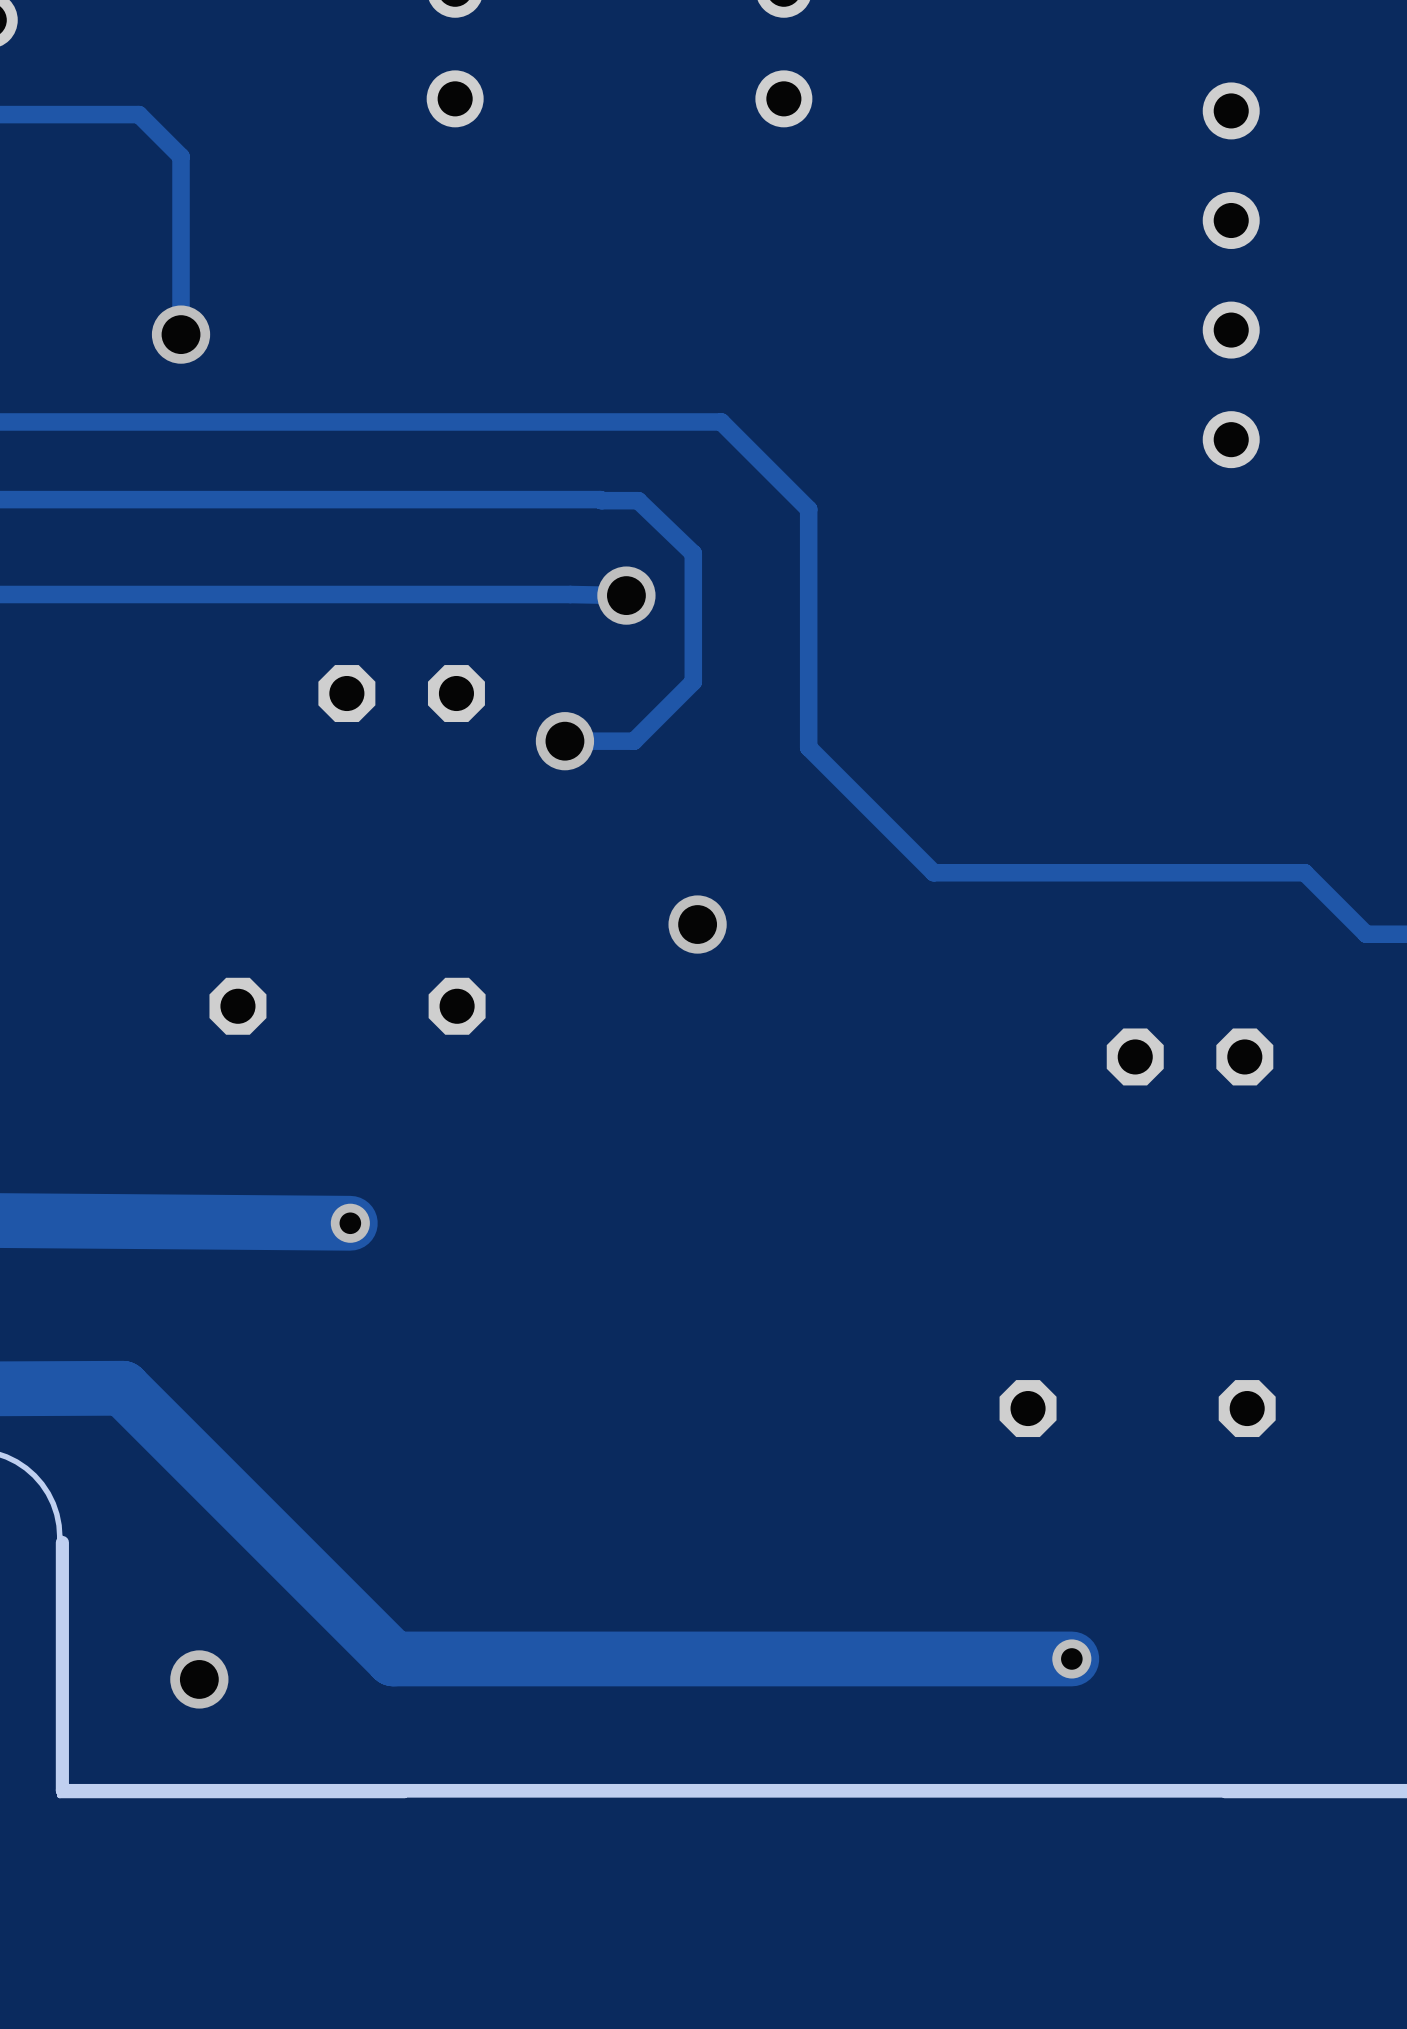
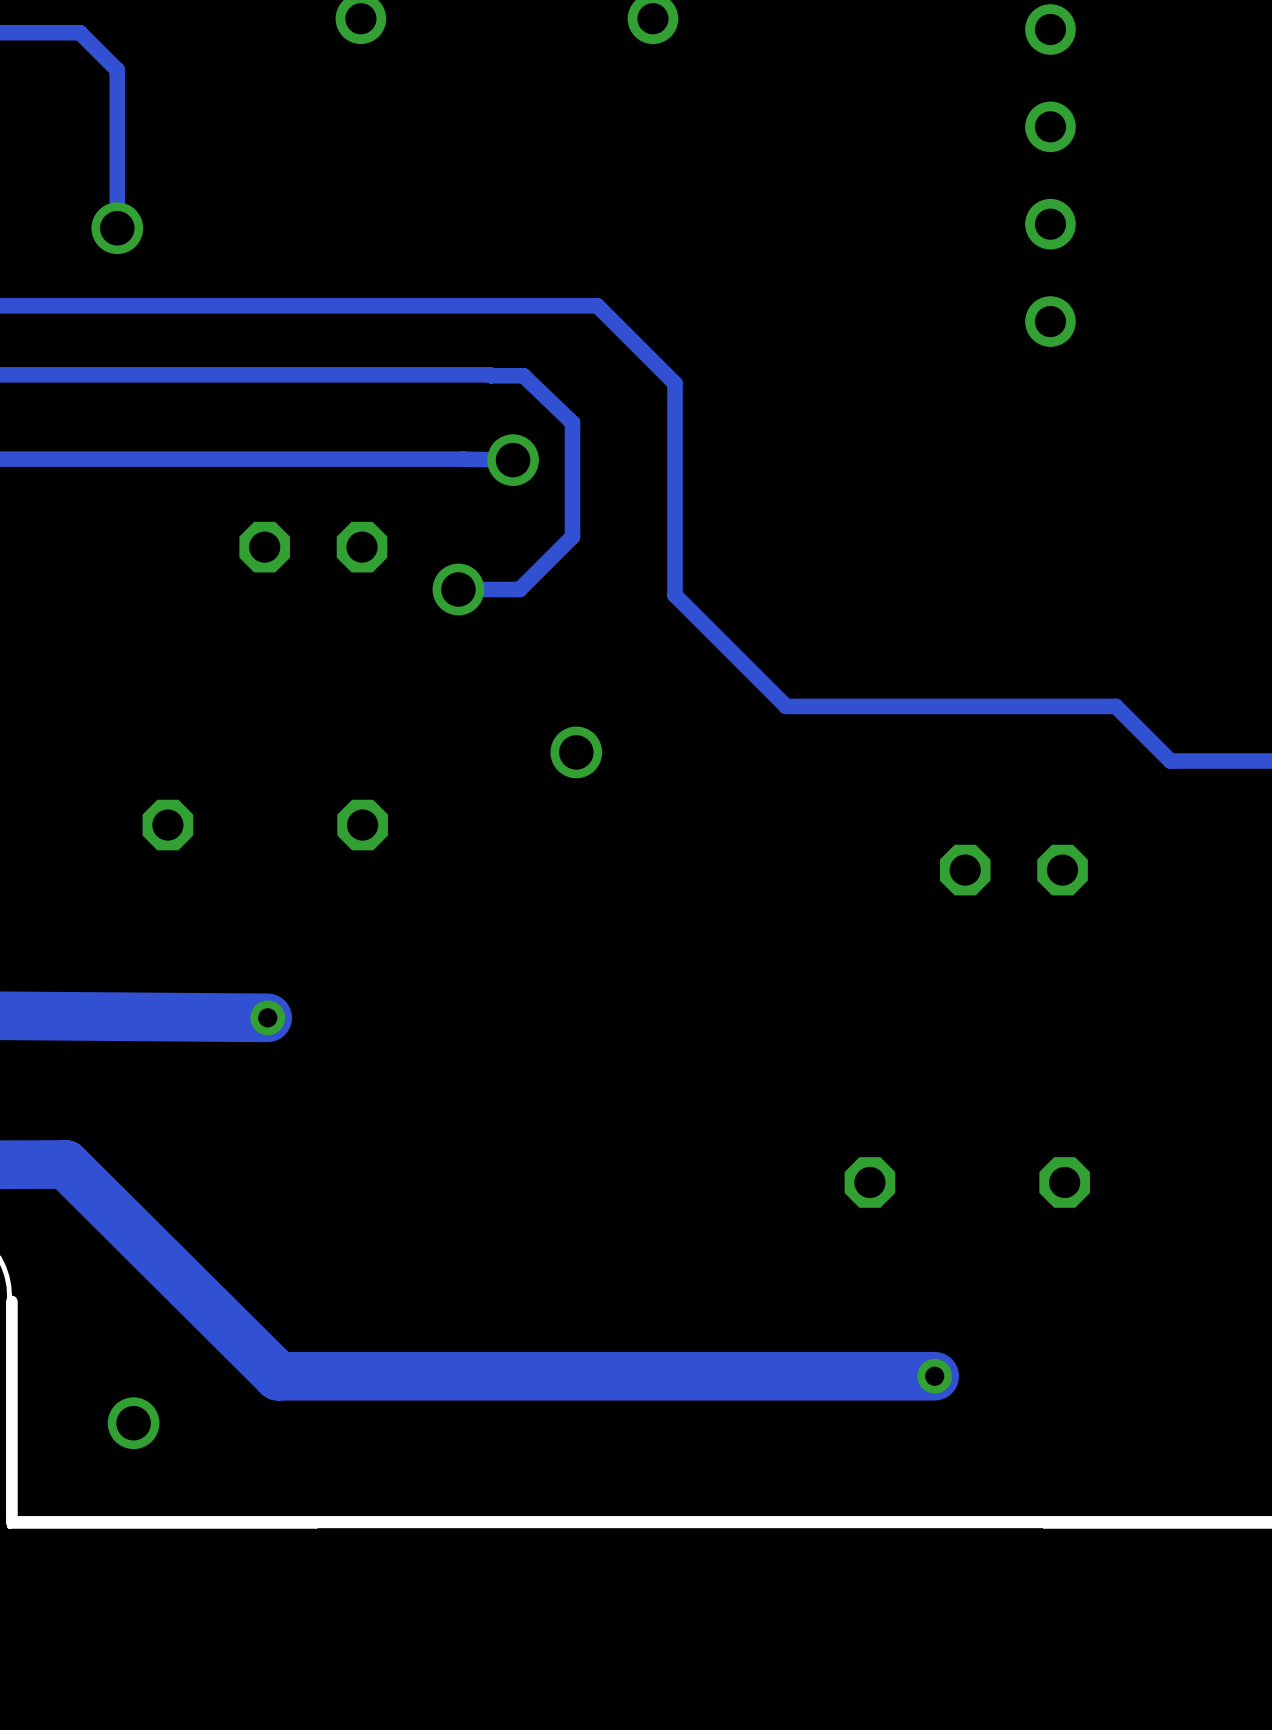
track: (122, 1388) (393, 1658) (1071, 1658) -> (65, 1164) (278, 1376) (934, 1376)
via position: (1071, 1658) -> (934, 1376)

